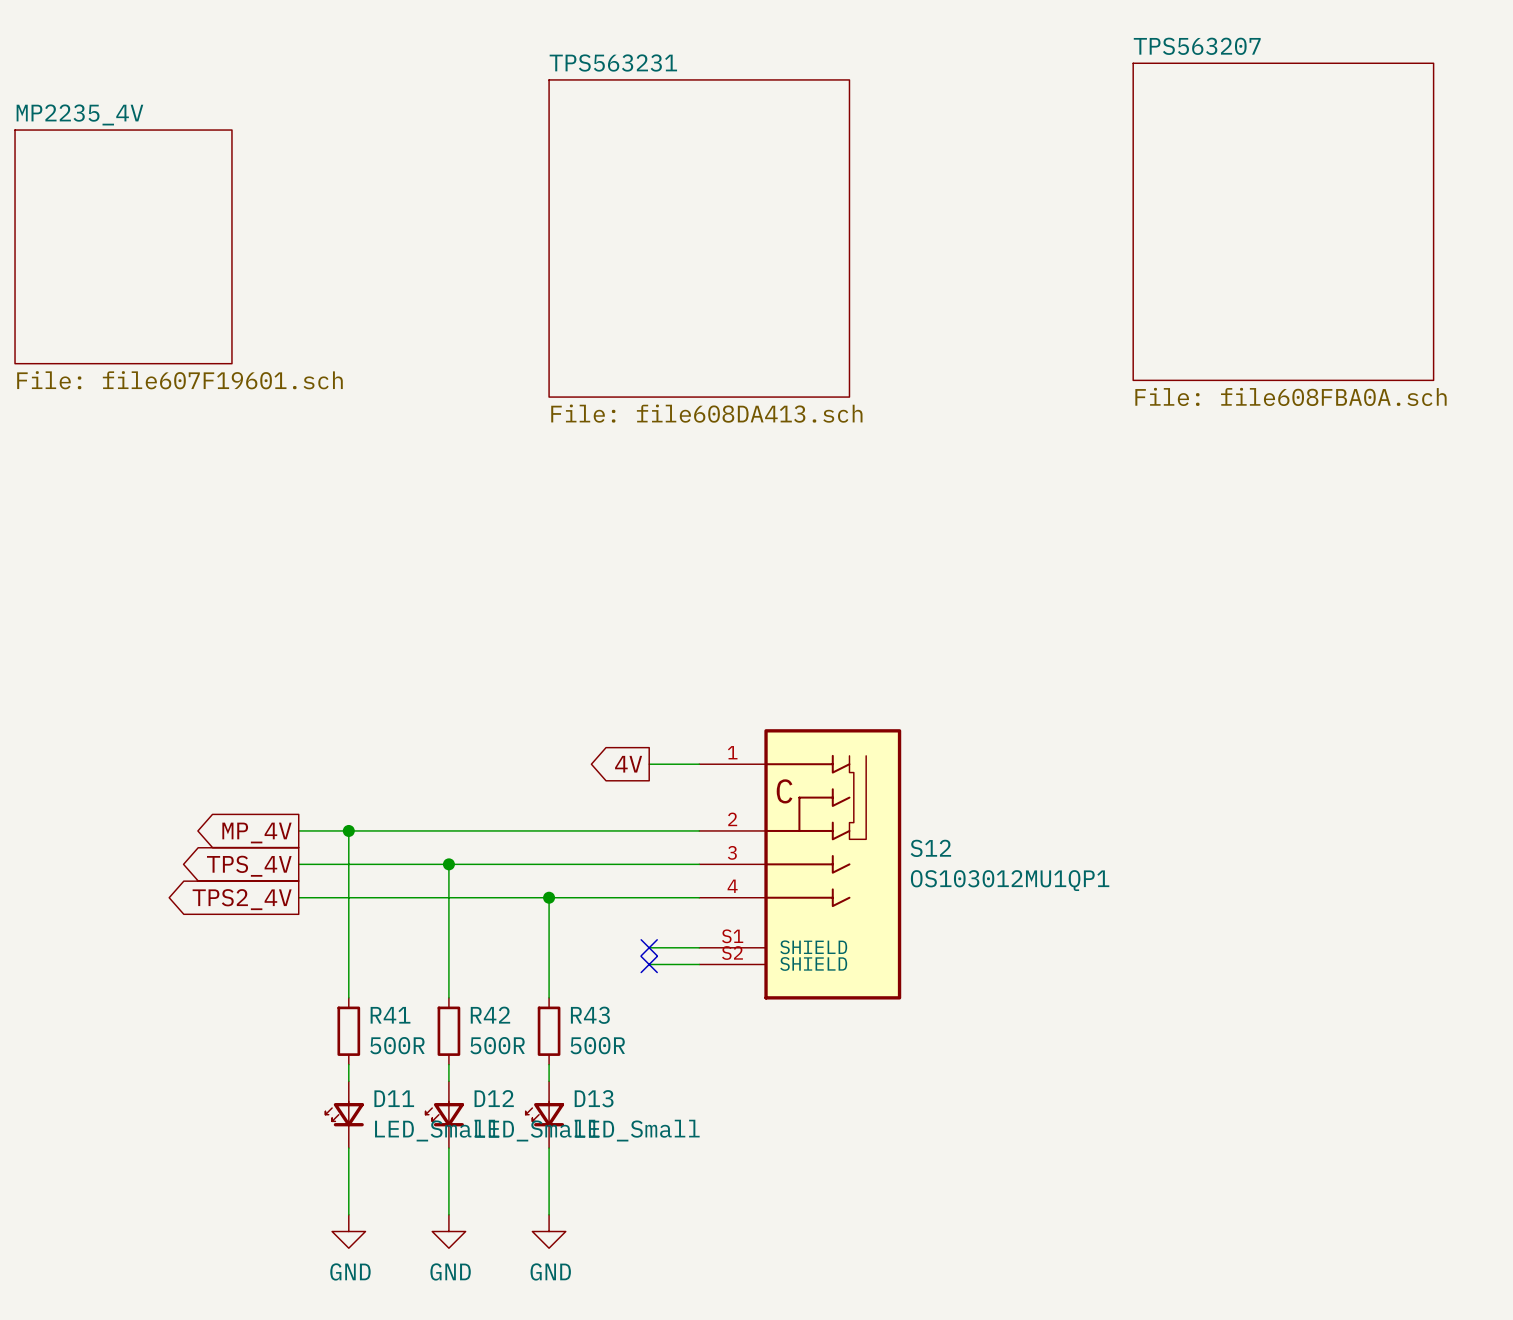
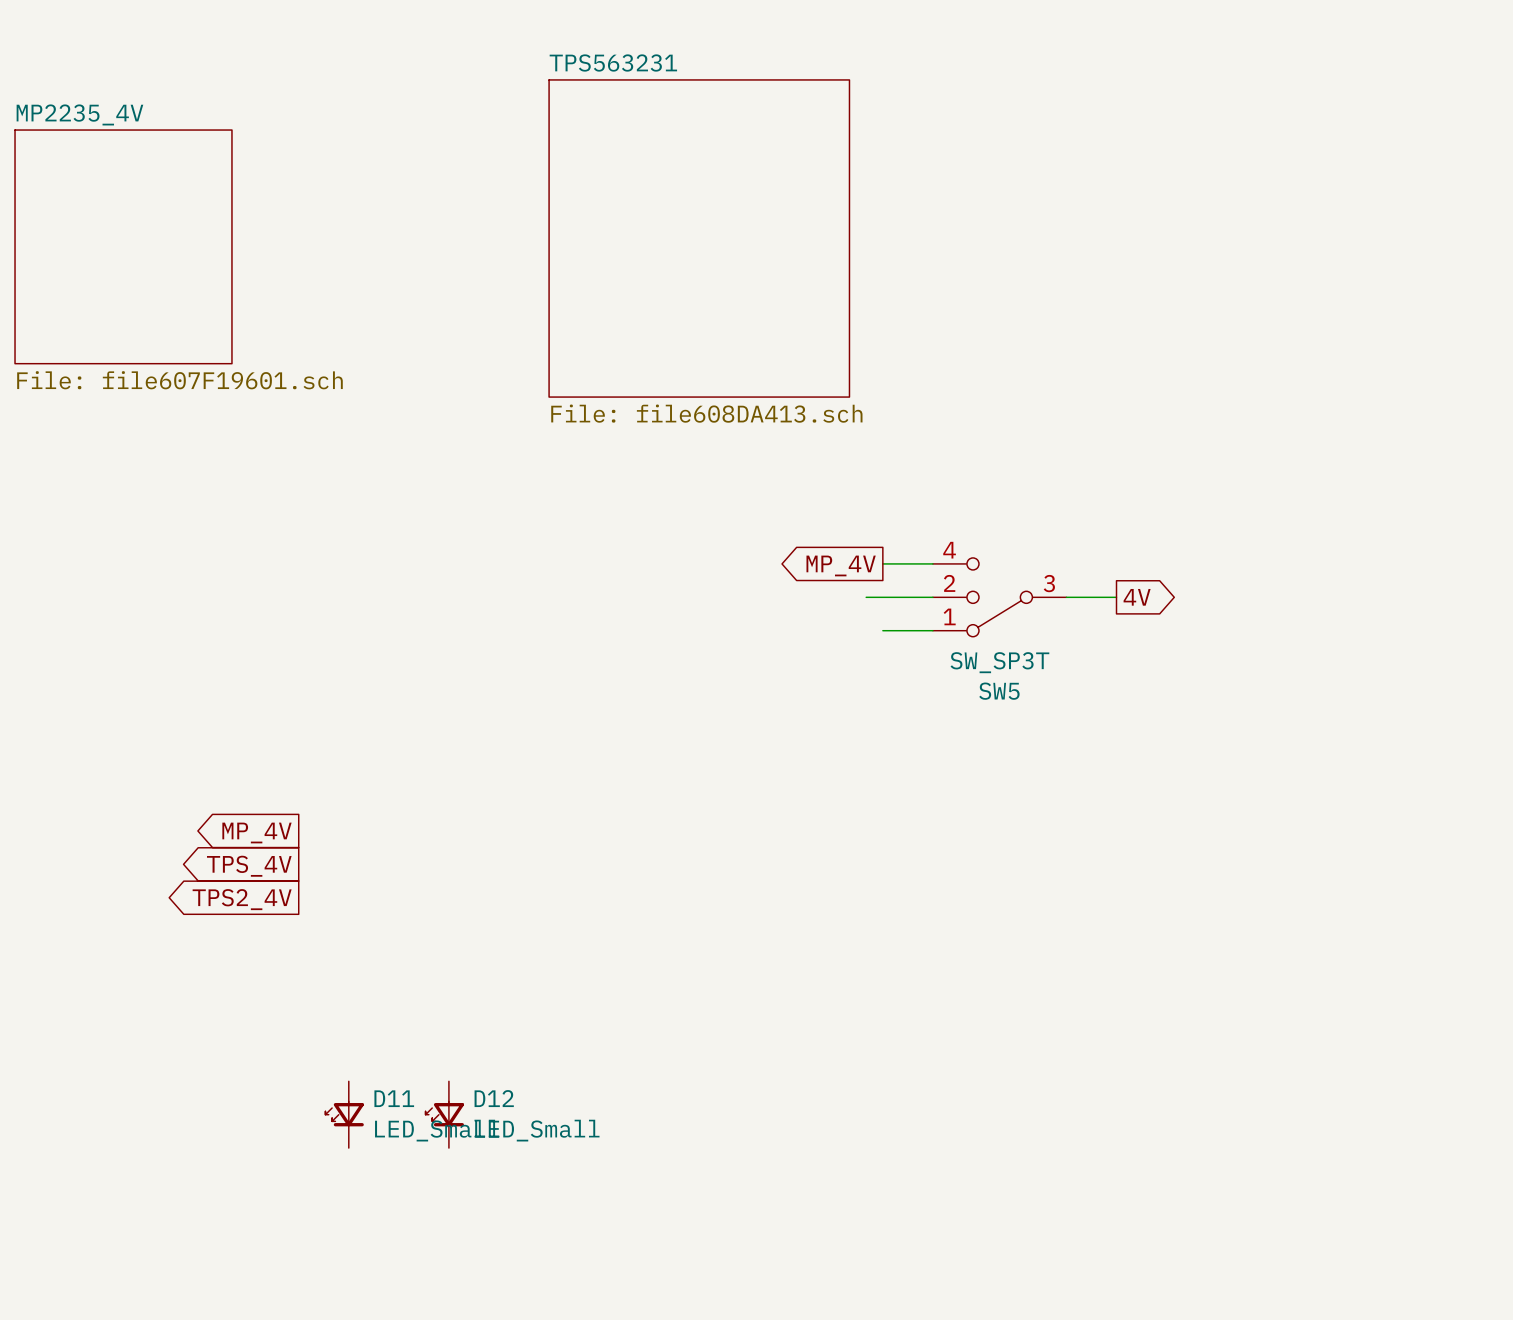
sheet TPS563207: File: file608FBA0A.sch (1283, 221) -> none
wire: none -> (882, 563) (932, 563)
global label: none -> MP_4V (841, 565)
wire: none -> (866, 597) (932, 597)
SW5: none -> SW_SP3T (999, 597)
wire: none -> (1066, 597) (1116, 597)
global label: none -> 4V (1137, 597)
global label: 4V (628, 764) -> none
wire: (649, 764) (699, 764) -> (882, 630) (932, 630)
wire: (298, 830) (699, 830) -> none
wire: (348, 830) (348, 997) -> none
junction: (348, 830) -> none
wire: (298, 864) (699, 864) -> none
wire: (448, 864) (448, 997) -> none
junction: (448, 864) -> none
S12: OS103012MU1QP1 (800, 864) -> none
wire: (298, 897) (699, 897) -> none
wire: (549, 897) (549, 997) -> none
junction: (549, 897) -> none
wire: (649, 947) (699, 947) -> none
no-connect mark: (649, 947) -> none
wire: (649, 964) (699, 964) -> none
no-connect mark: (649, 964) -> none
R41: 500R (348, 1031) -> none
R42: 500R (448, 1031) -> none
R43: 500R (549, 1031) -> none
wire: (348, 1064) (348, 1081) -> none
wire: (448, 1064) (448, 1081) -> none
wire: (549, 1064) (549, 1081) -> none
D13: LED_Small (544, 1114) -> none
wire: (348, 1148) (348, 1214) -> none
wire: (448, 1148) (448, 1214) -> none
wire: (549, 1148) (549, 1214) -> none
power symbol: GND (348, 1231) -> none
power symbol: GND (448, 1231) -> none
power symbol: GND (549, 1231) -> none

